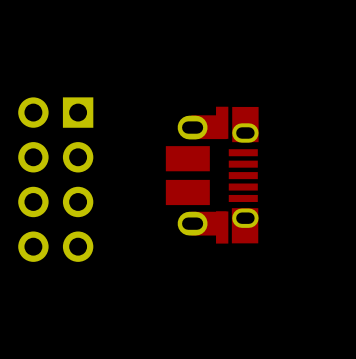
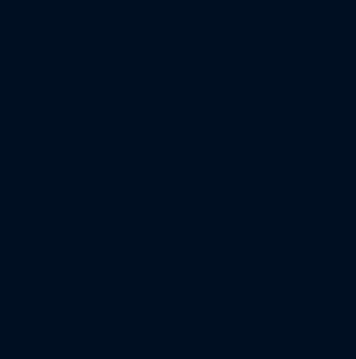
part: (212, 175) -> none
part: (55, 179) -> none

